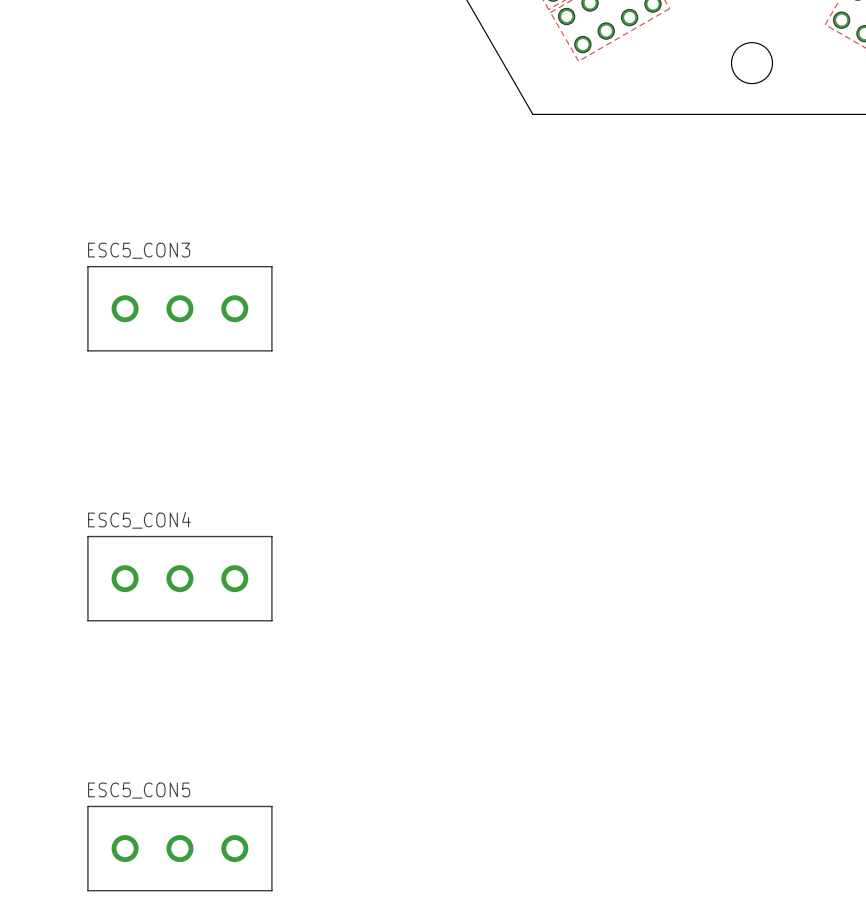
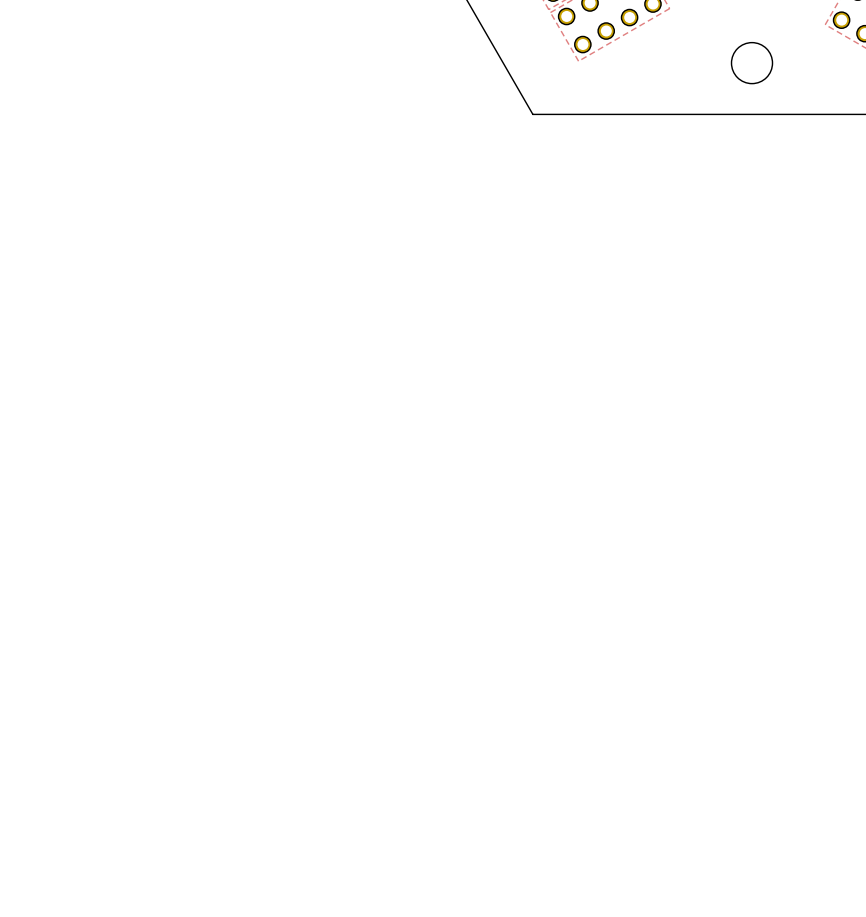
ESC5_CON3: (179, 308) -> none
ESC5_CON4: (179, 578) -> none
ESC5_CON5: (179, 848) -> none

